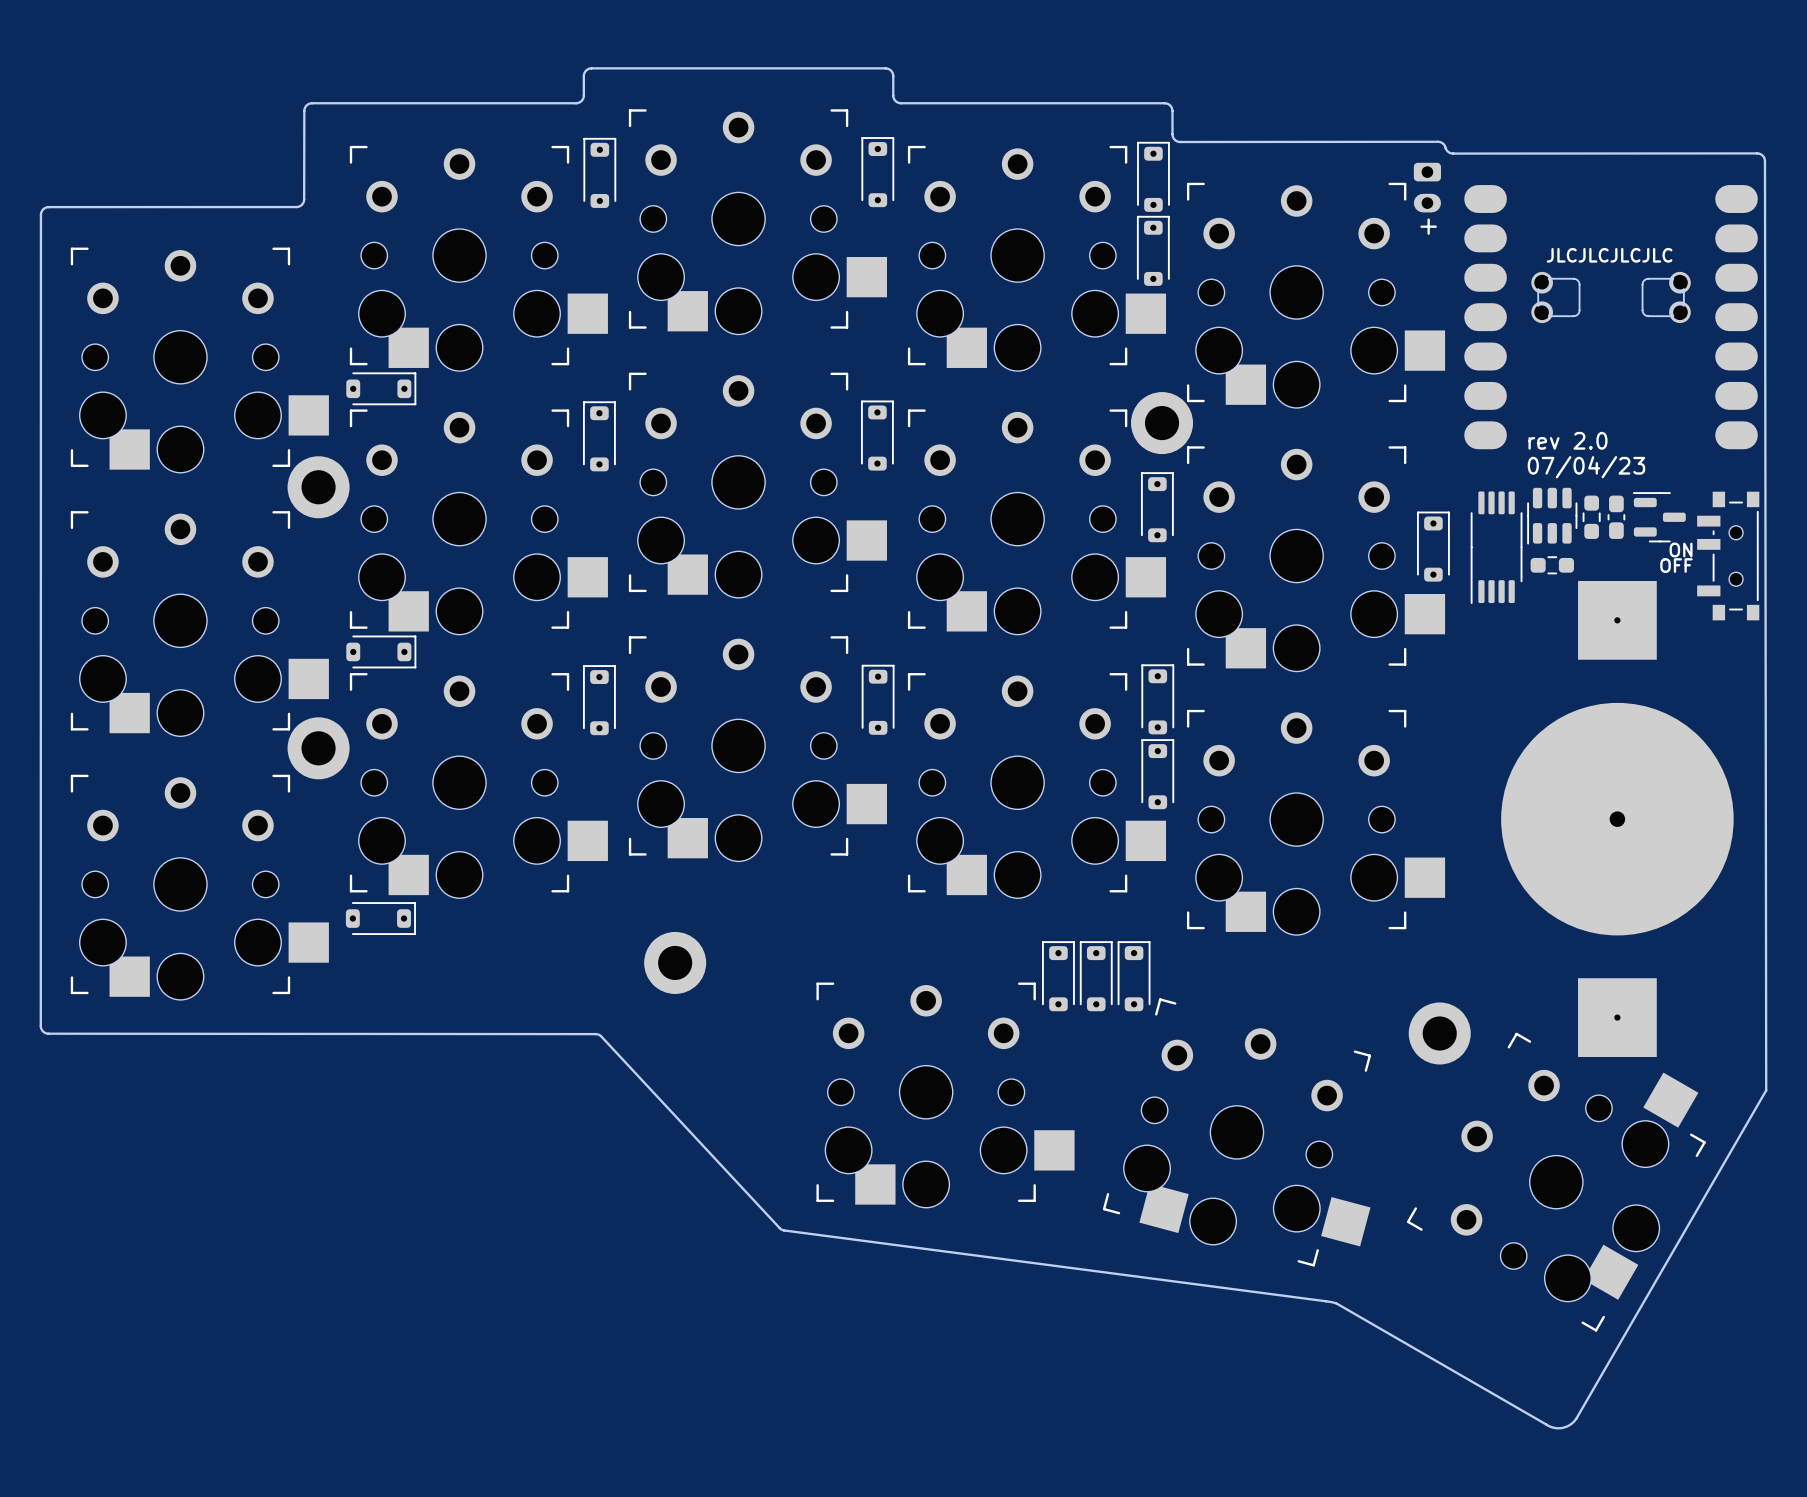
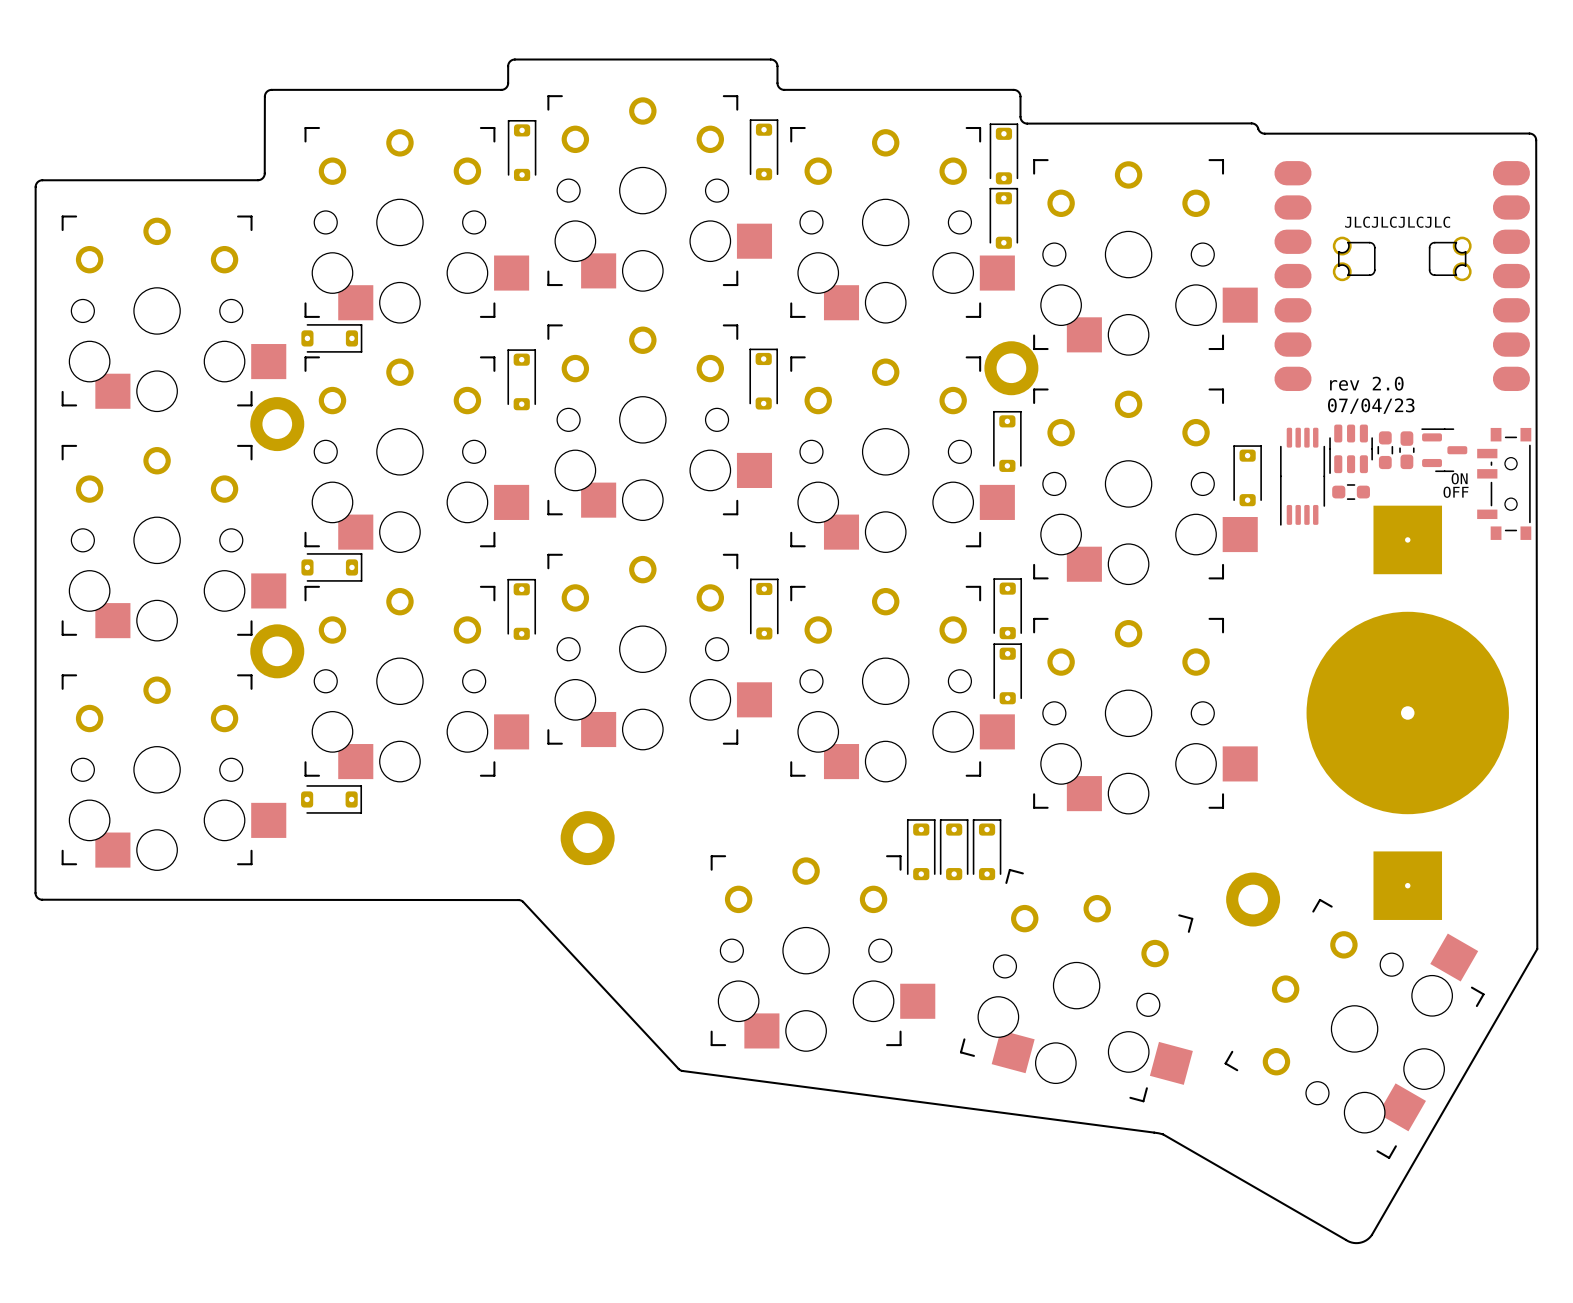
part: (1427, 187) -> none
text: + (1428, 226) -> none

